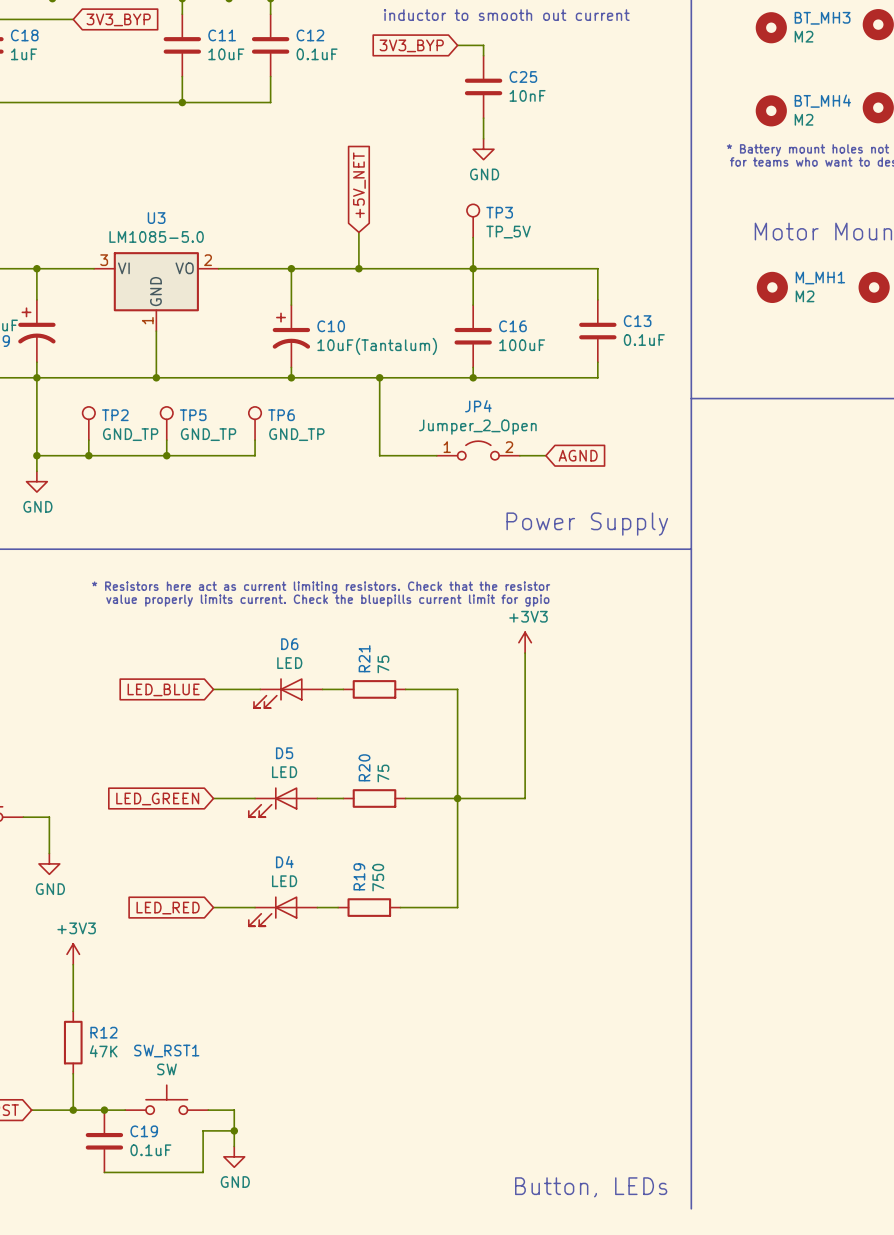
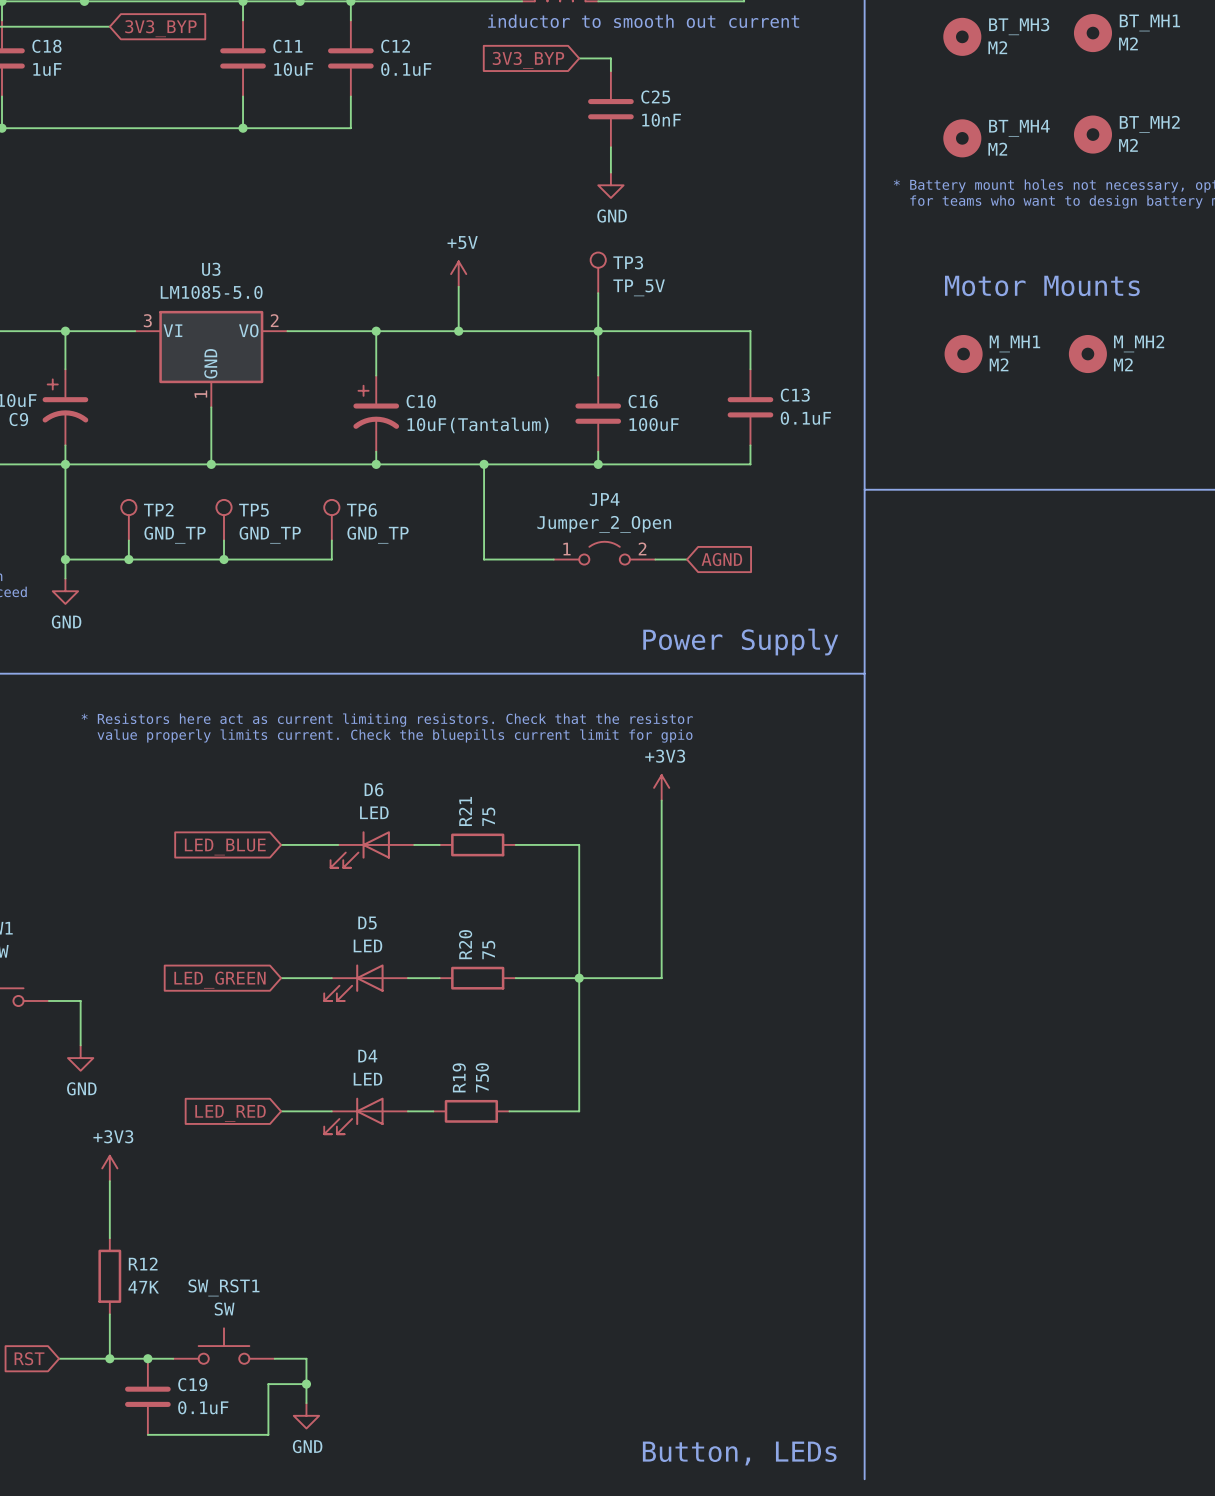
global label: +5V_NET (359, 185) -> none
power symbol: none -> +5V (458, 274)

